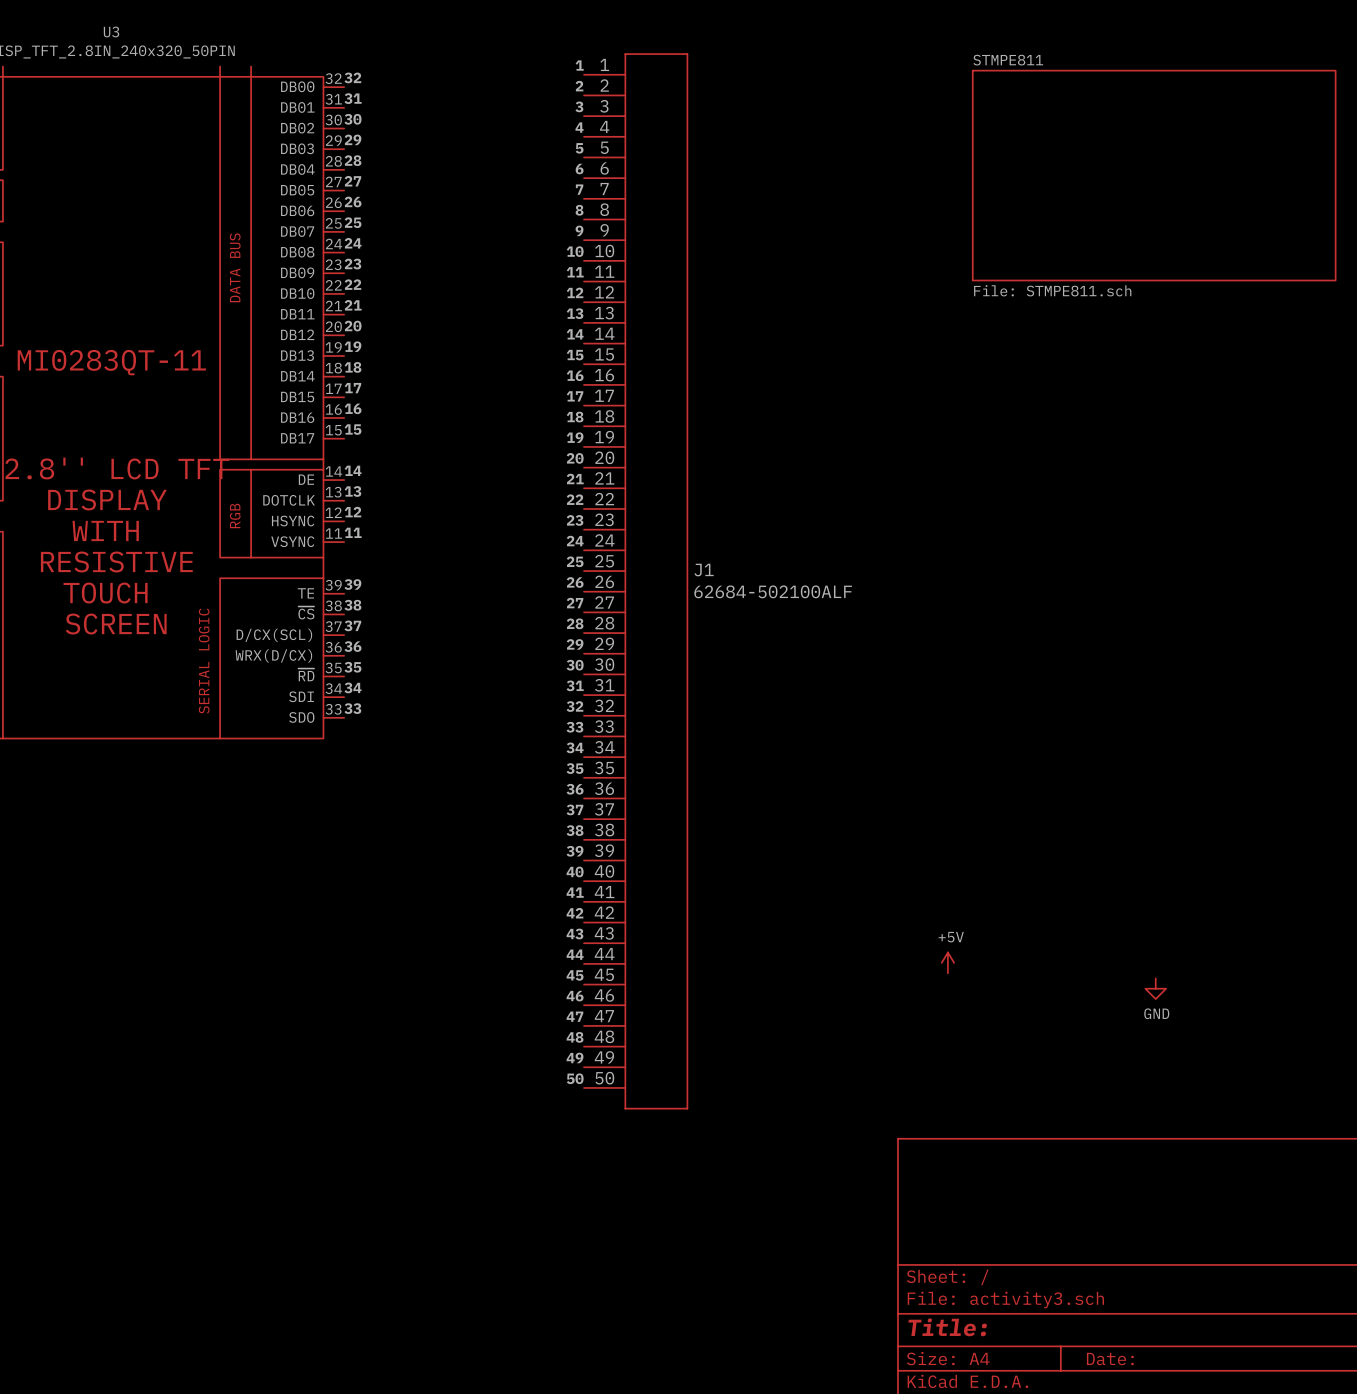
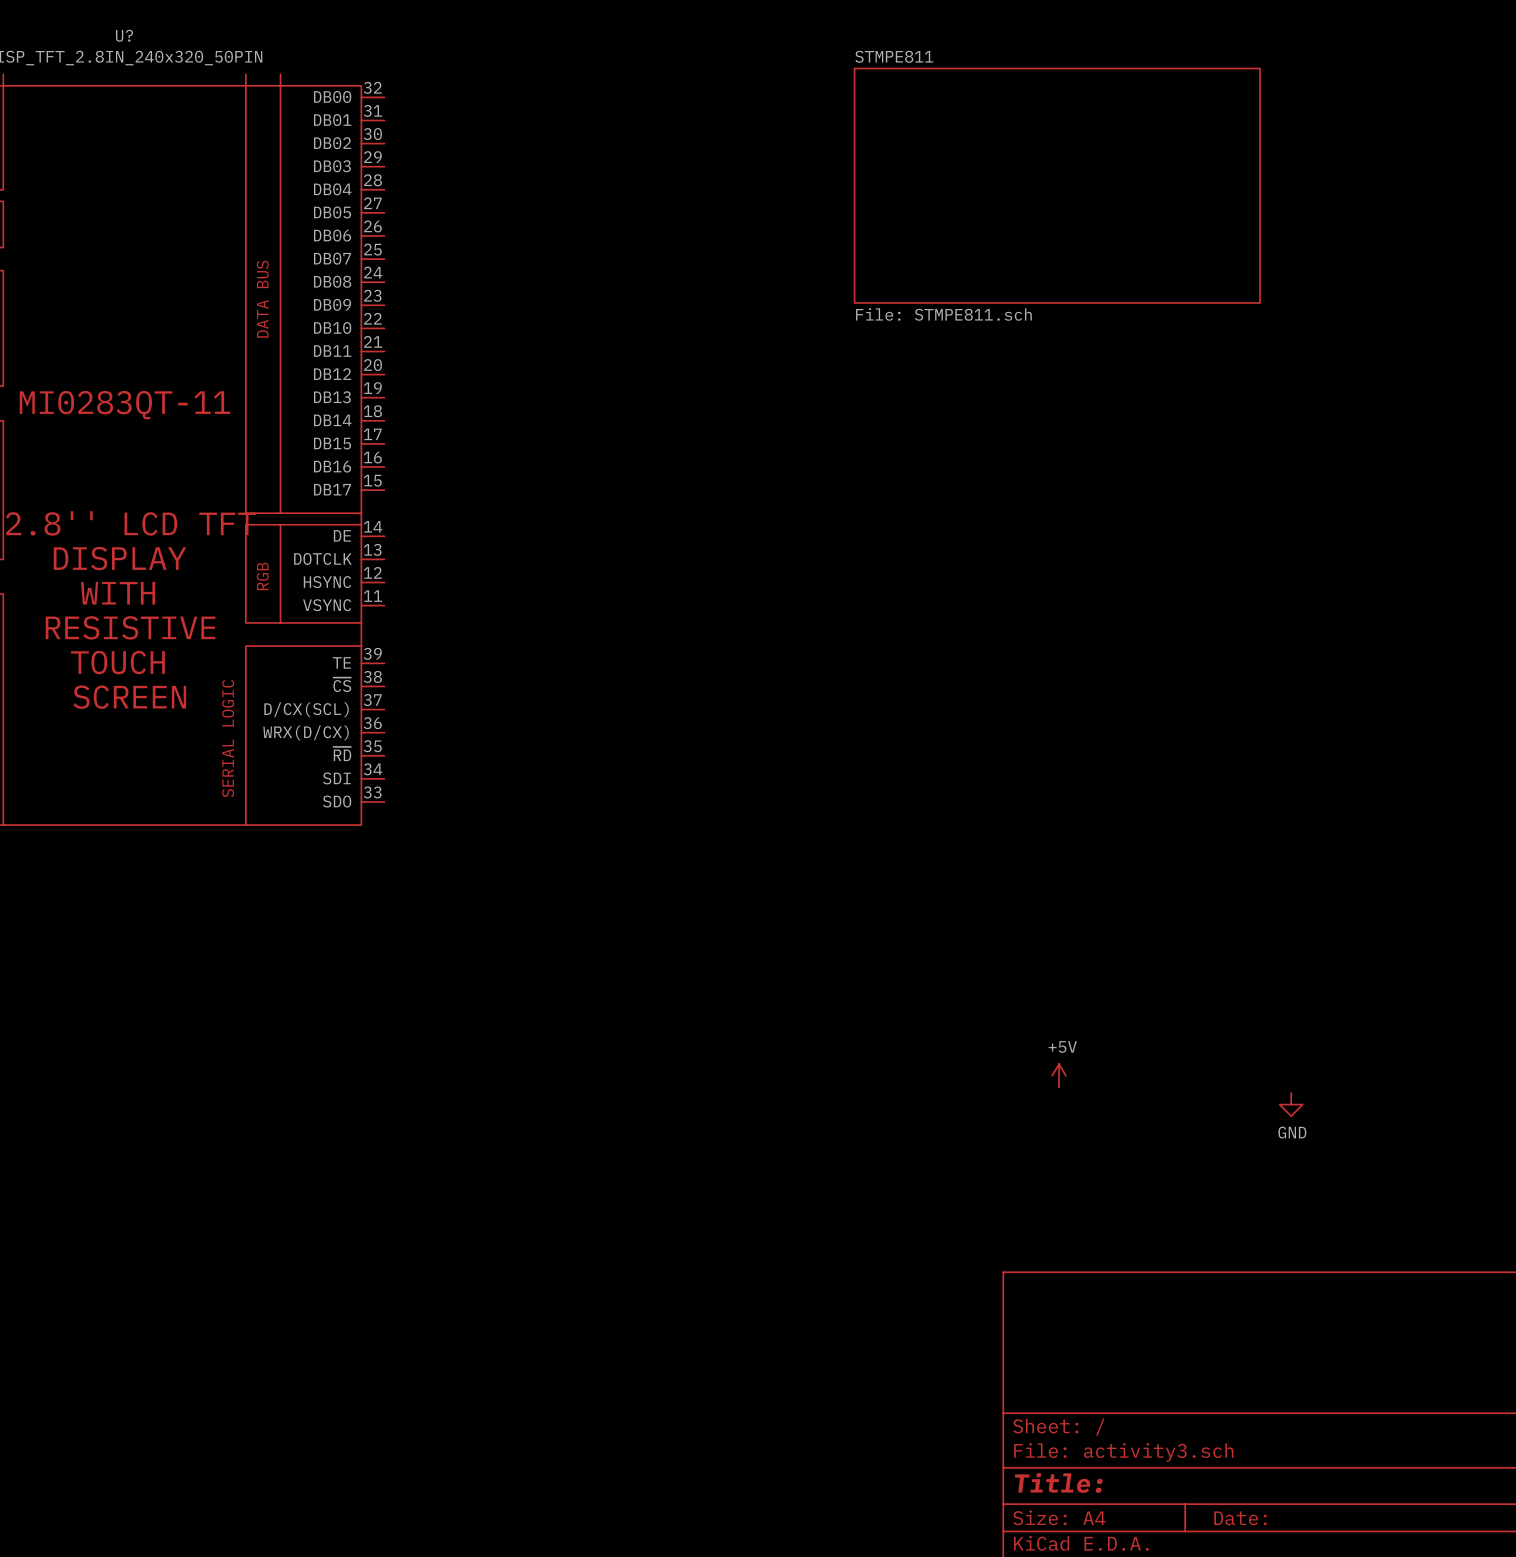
U3 name: U3 (111, 31) -> U? (124, 35)
label: 1 (579, 65) -> none
label: 32 (352, 77) -> none
label: 2 (579, 86) -> none
label: 31 (353, 98) -> none
label: 3 (579, 106) -> none
label: 30 (353, 119) -> none
label: 4 (579, 127) -> none
label: 29 (353, 139) -> none
label: 5 (579, 148) -> none
label: 28 (353, 160) -> none
label: 6 (579, 169) -> none
sheet STMPE811 position: (1154, 175) -> (1057, 185)
label: 27 (352, 181) -> none
label: 7 (579, 189) -> none
label: 26 (353, 202) -> none
label: 8 (579, 210) -> none
label: 25 (353, 222) -> none
label: 9 (579, 230) -> none
label: 24 (353, 243) -> none
label: 10 (575, 251) -> none
label: 23 (352, 264) -> none
label: 11 (575, 272) -> none
label: 22 (352, 284) -> none
label: 12 (575, 292) -> none
label: 21 (353, 305) -> none
label: 13 (575, 313) -> none
label: 20 (353, 326) -> none
label: 14 (575, 334) -> none
label: 19 (353, 346) -> none
label: 15 (575, 355) -> none
label: 18 (353, 367) -> none
label: 16 (575, 375) -> none
label: 17 (352, 388) -> none
label: 17 (575, 396) -> none
label: 16 (353, 408) -> none
label: 18 (575, 417) -> none
label: 15 (353, 429) -> none
label: 19 (575, 437) -> none
label: 20 (575, 458) -> none
label: 14 (353, 470) -> none
label: 21 (575, 479) -> none
label: 13 (352, 491) -> none
label: 22 (575, 499) -> none
label: 12 (352, 512) -> none
label: 23 (575, 520) -> none
label: 11 (353, 532) -> none
label: 24 (575, 541) -> none
label: 25 (575, 561) -> none
J1: 62684-502100ALF (635, 581) -> none
label: 26 (575, 582) -> none
label: 39 (352, 584) -> none
label: 27 (575, 603) -> none
label: 38 (352, 605) -> none
label: 28 (575, 623) -> none
label: 37 (352, 625) -> none
label: 29 (575, 644) -> none
label: 36 (352, 646) -> none
label: 30 (575, 665) -> none
label: 35 (352, 667) -> none
label: 31 (575, 685) -> none
label: 34 (353, 687) -> none
label: 32 (574, 706) -> none
label: 33 (352, 708) -> none
label: 33 (574, 727) -> none
label: 34 (575, 747) -> none
label: 35 (575, 768) -> none
label: 36 (575, 789) -> none
label: 37 (574, 809) -> none
label: 38 (575, 830) -> none
label: 39 (575, 851) -> none
label: 40 (575, 871) -> none
label: 41 (575, 892) -> none
label: 42 (574, 913) -> none
label: 43 (574, 933) -> none
label: 44 (575, 954) -> none
label: 45 (575, 975) -> none
label: 46 (575, 996) -> none
label: 47 (574, 1016) -> none
label: 48 (575, 1037) -> none
label: 49 (575, 1057) -> none
label: 50 (575, 1078) -> none

